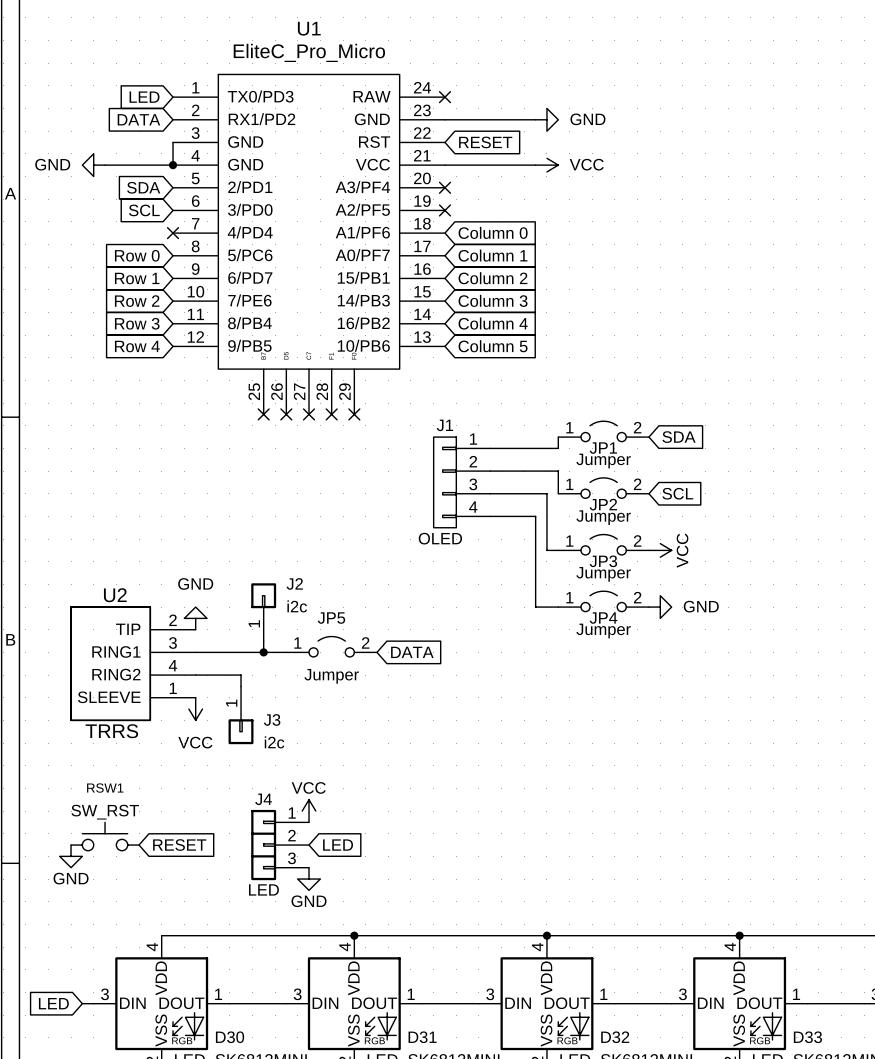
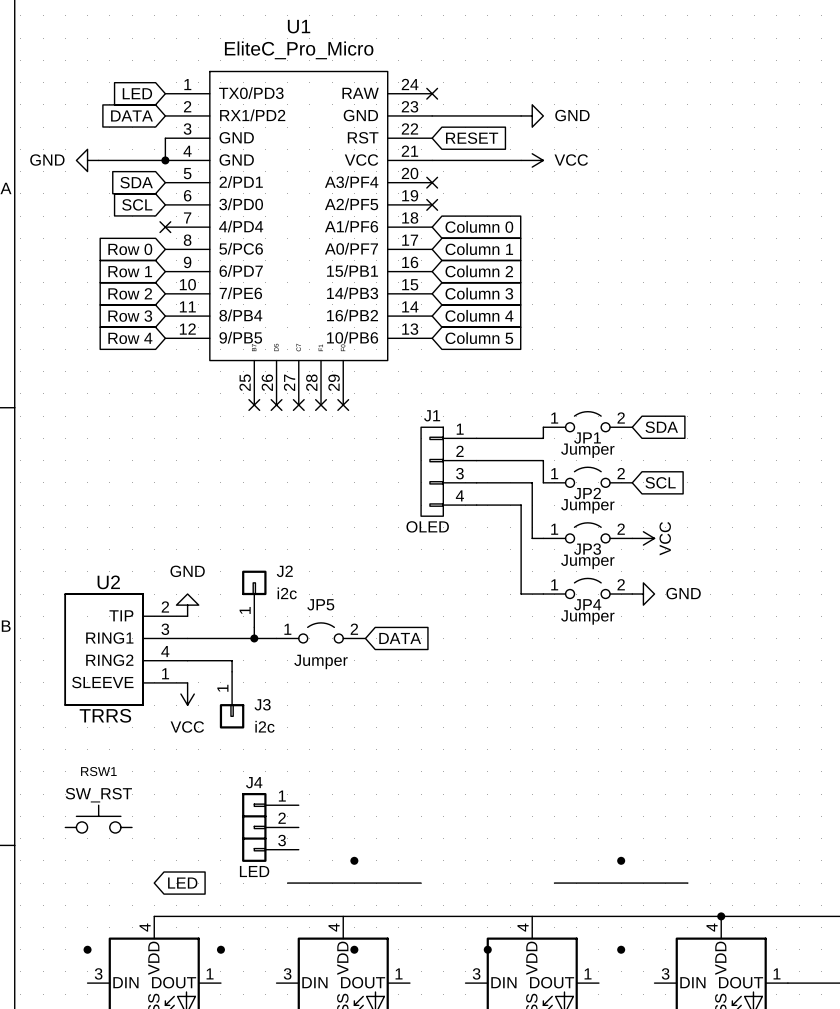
power symbol: VCC (309, 811) -> none
global label: RESET (179, 845) -> none
global label: LED (338, 845) -> none
power symbol: GND (71, 856) -> none
power symbol: GND (309, 879) -> none
junction: none -> (354, 860)
junction: none -> (621, 860)
global label: none -> LED (182, 883)
wire: none -> (287, 883) (421, 883)
wire: none -> (554, 883) (687, 883)
junction: (354, 935) -> none
junction: (546, 935) -> none
junction: none -> (87, 949)
junction: none -> (220, 949)
junction: none -> (354, 949)
junction: none -> (487, 949)
junction: none -> (621, 949)
global label: LED (53, 1003) -> none
wire: (82, 1003) (93, 1003) -> none
wire: (229, 1003) (286, 1003) -> none
wire: (422, 1003) (478, 1003) -> none
wire: (614, 1003) (671, 1003) -> none

